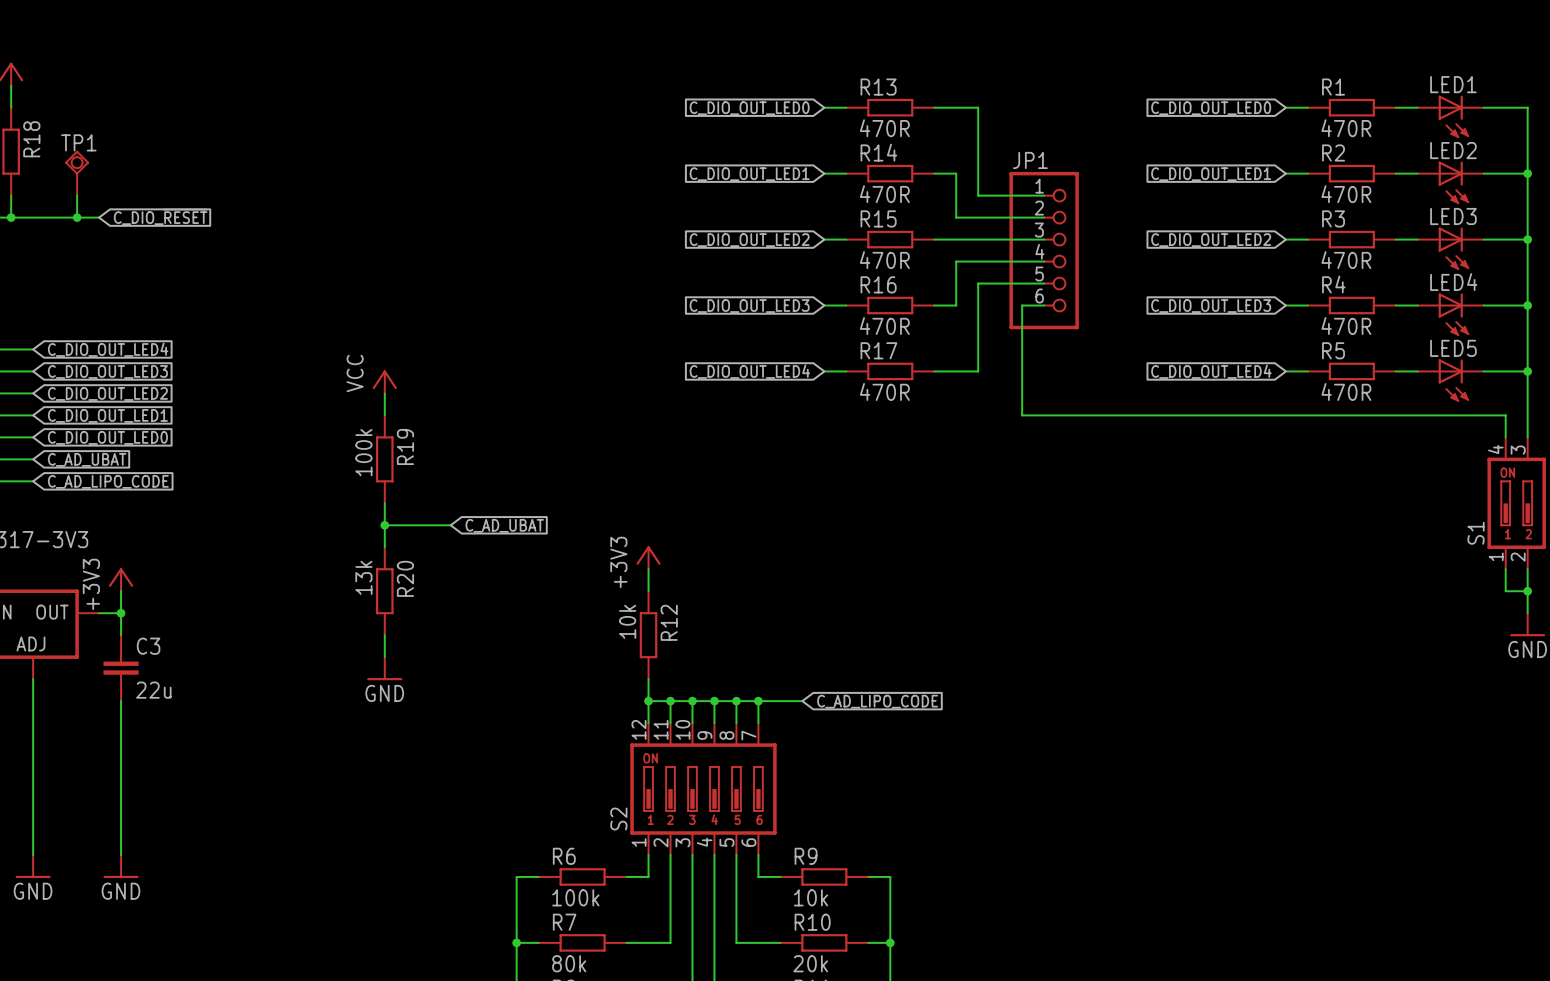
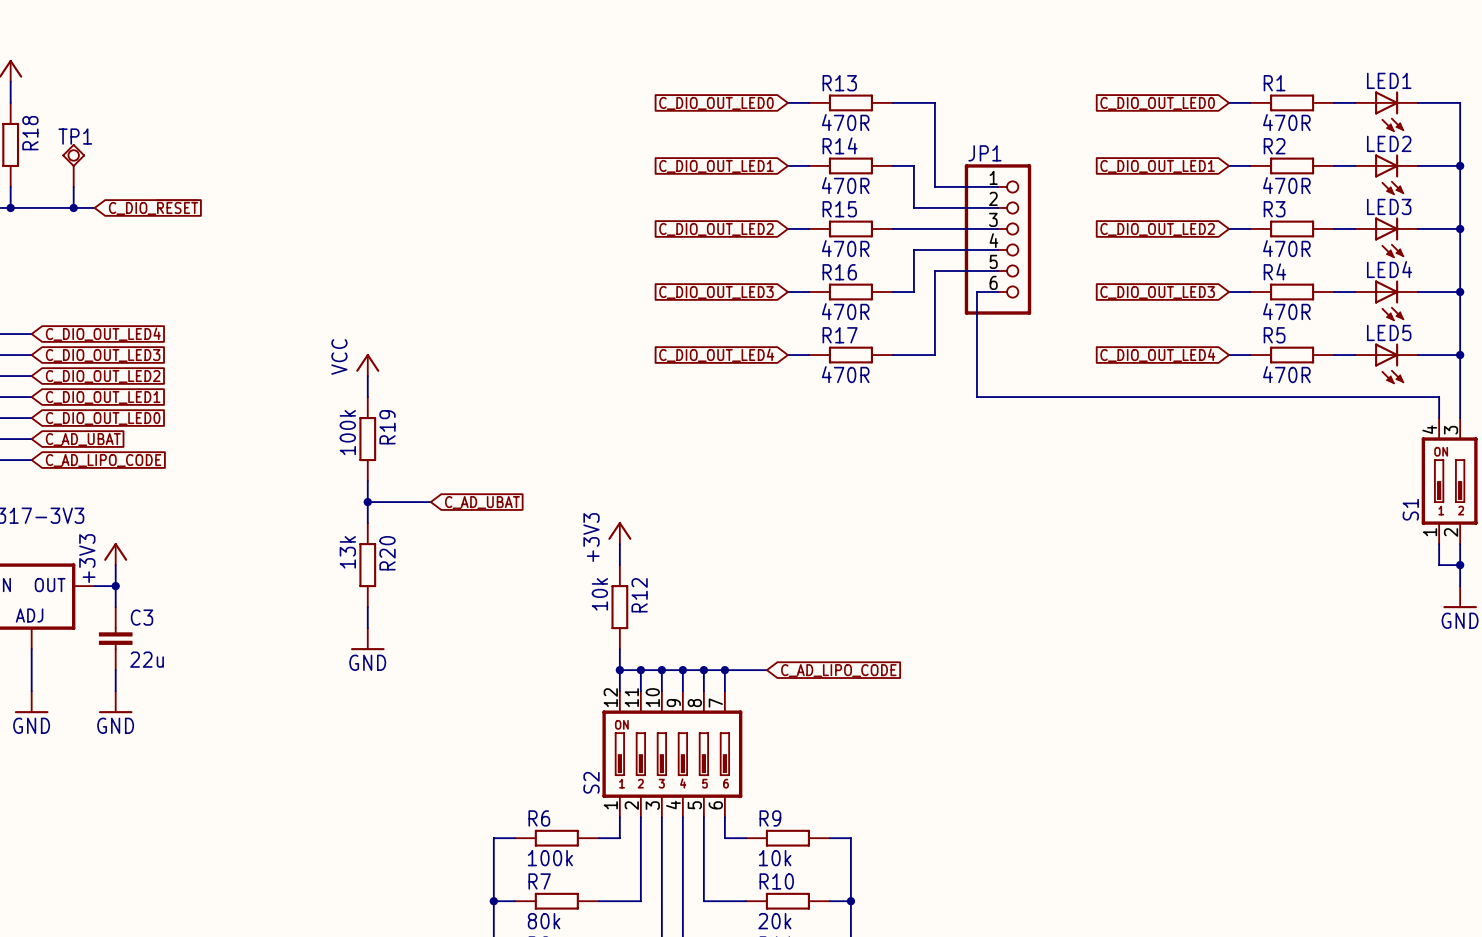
wire: (33, 723) (33, 854) -> none
wire: (121, 723) (121, 854) -> none
power symbol: none -> GND (31, 702)
power symbol: none -> GND (115, 702)
power symbol: GND (33, 866) -> none
power symbol: GND (121, 866) -> none

